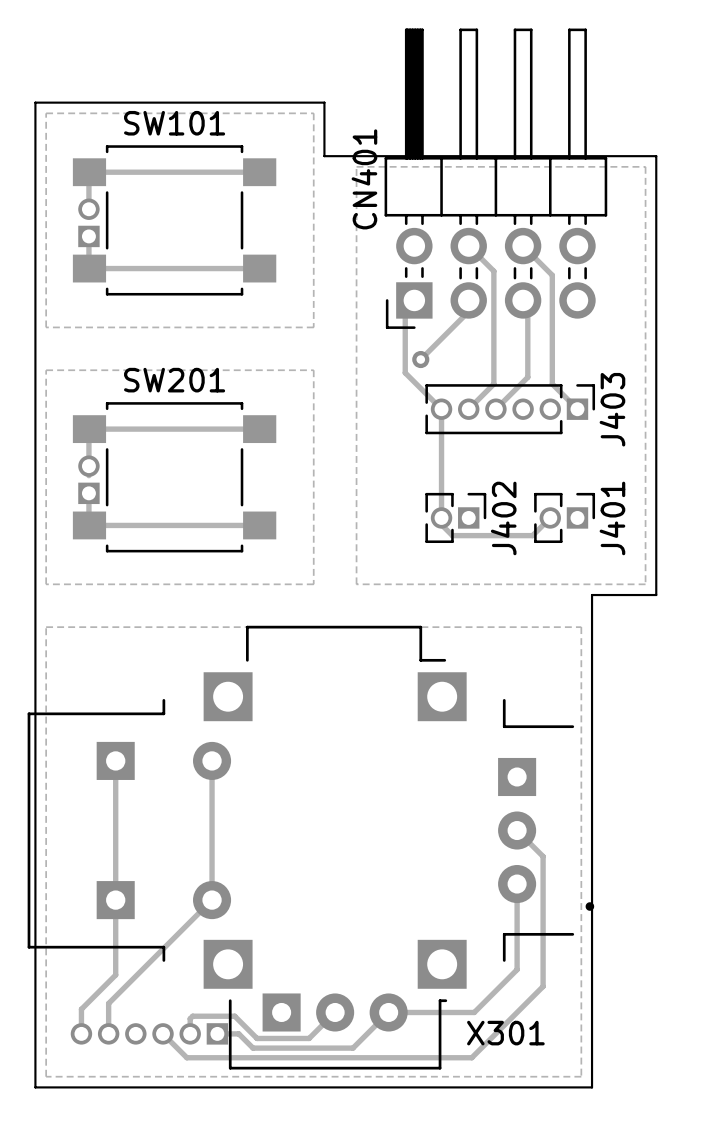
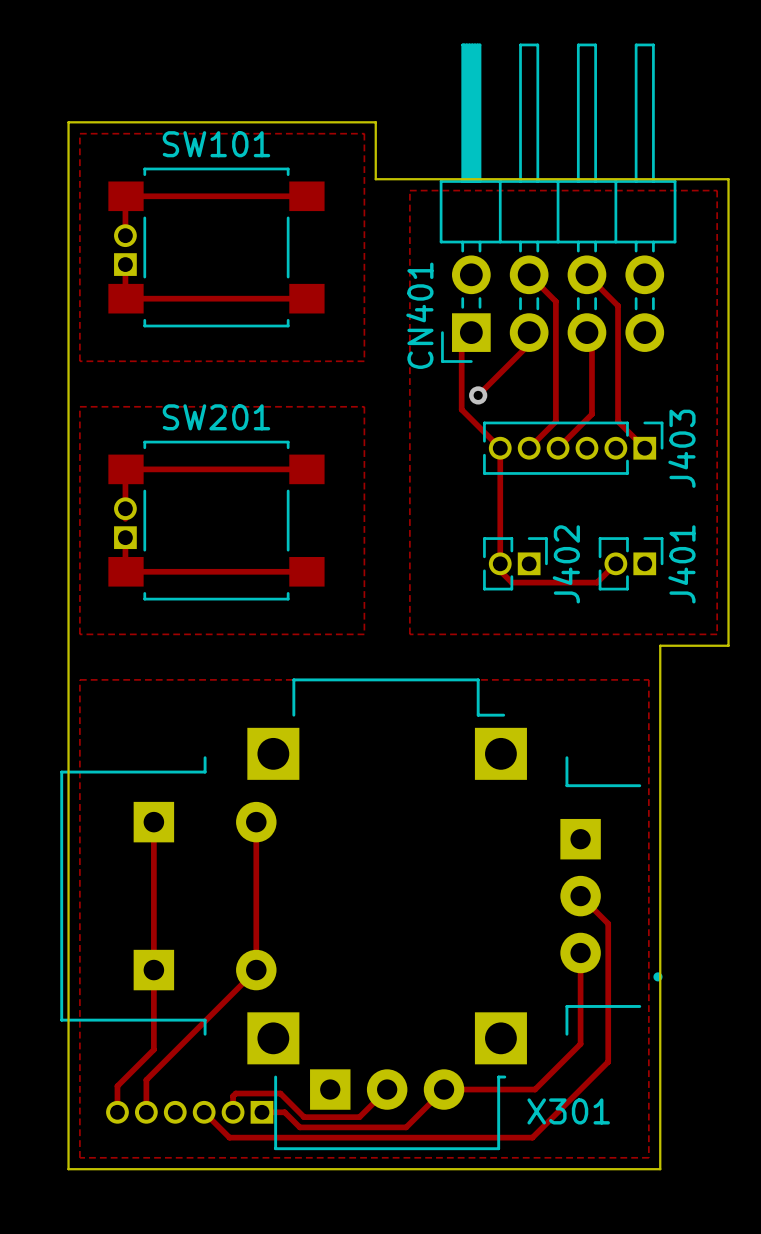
CN401 name position: CN401 (364, 179) -> CN401 (419, 315)

